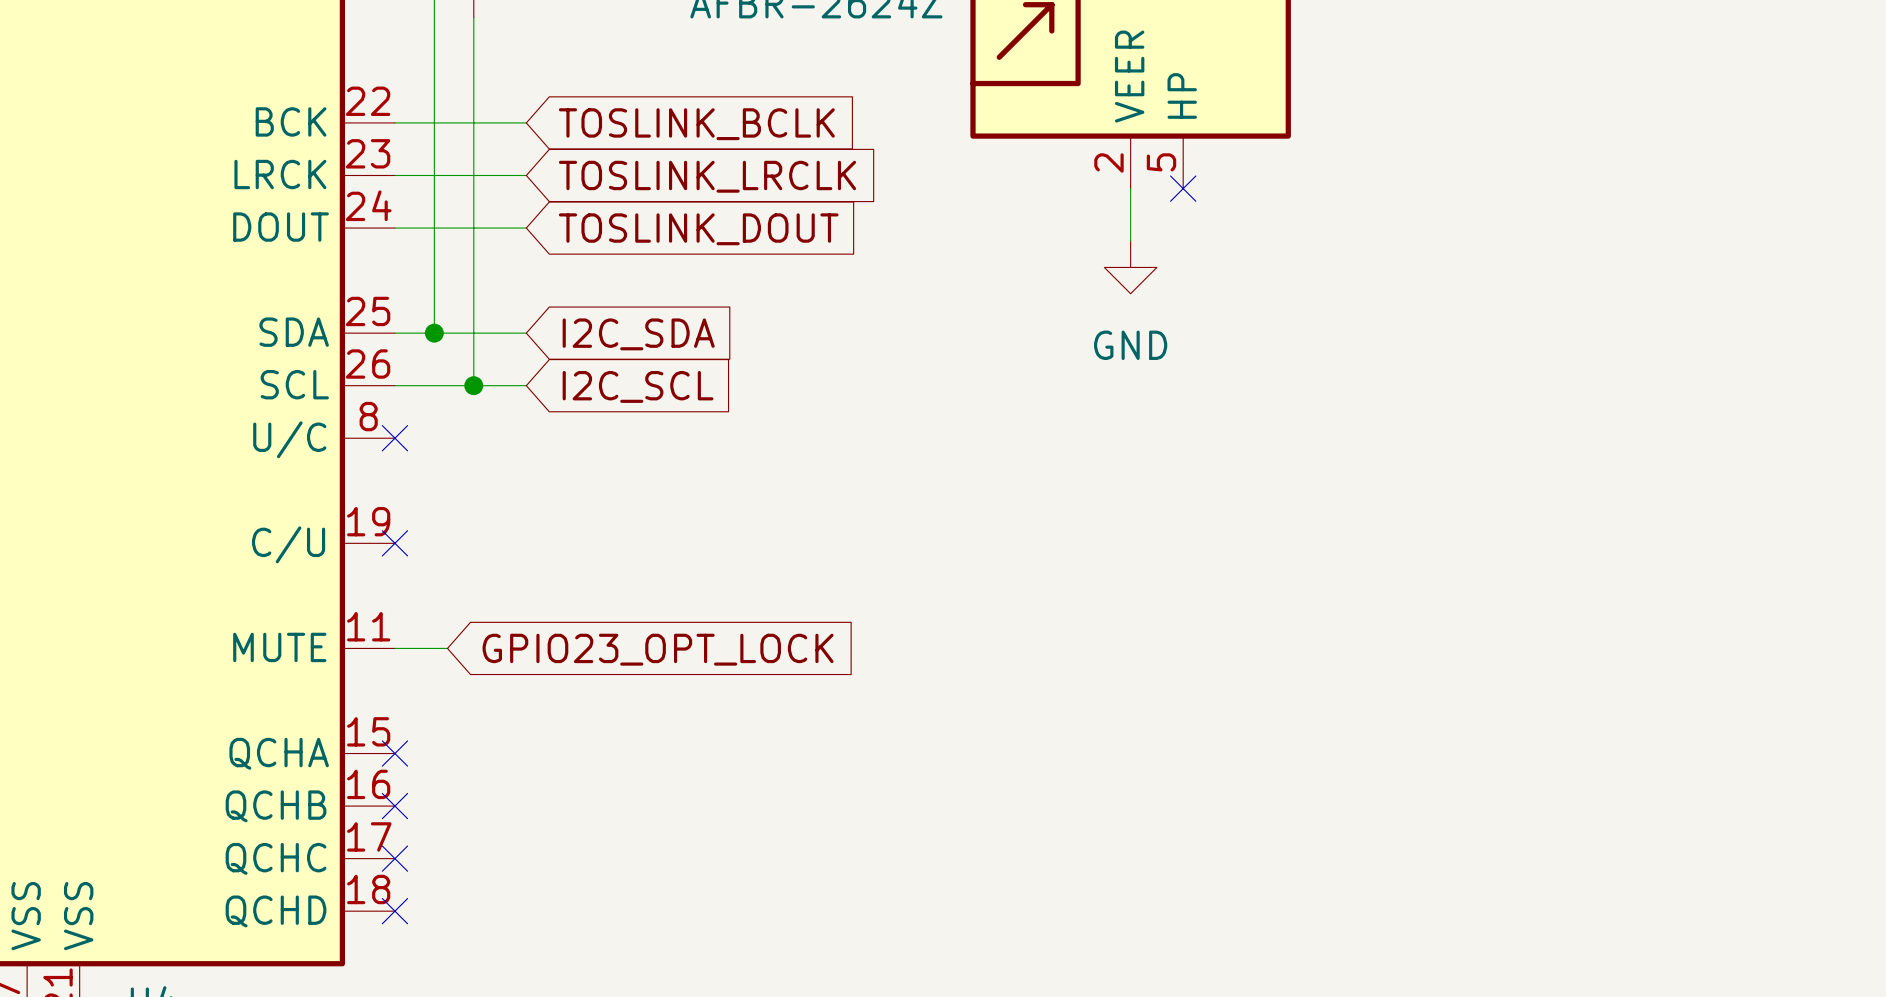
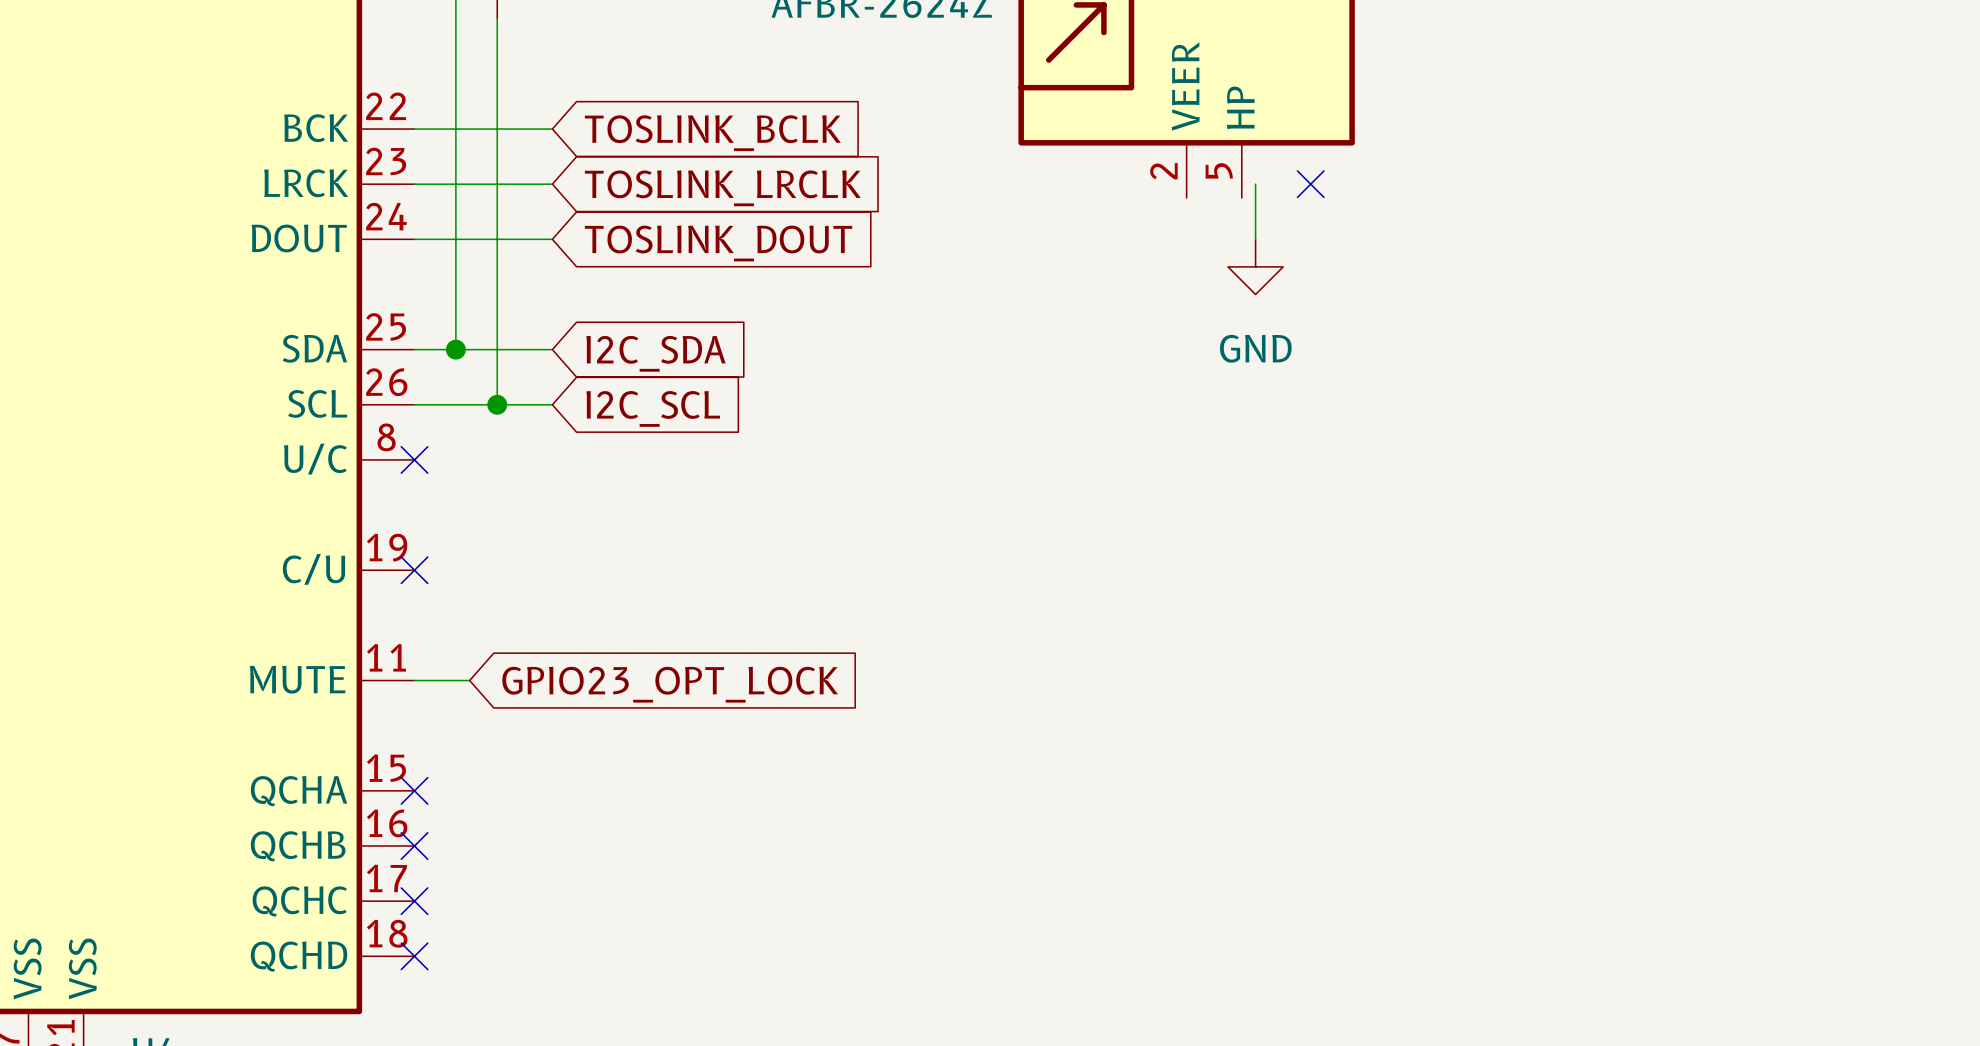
wire: (1130, 188) (1130, 241) -> (1255, 184) (1255, 239)
no-connect mark position: (1183, 188) -> (1310, 184)
power symbol position: GND (1130, 267) -> GND (1255, 266)

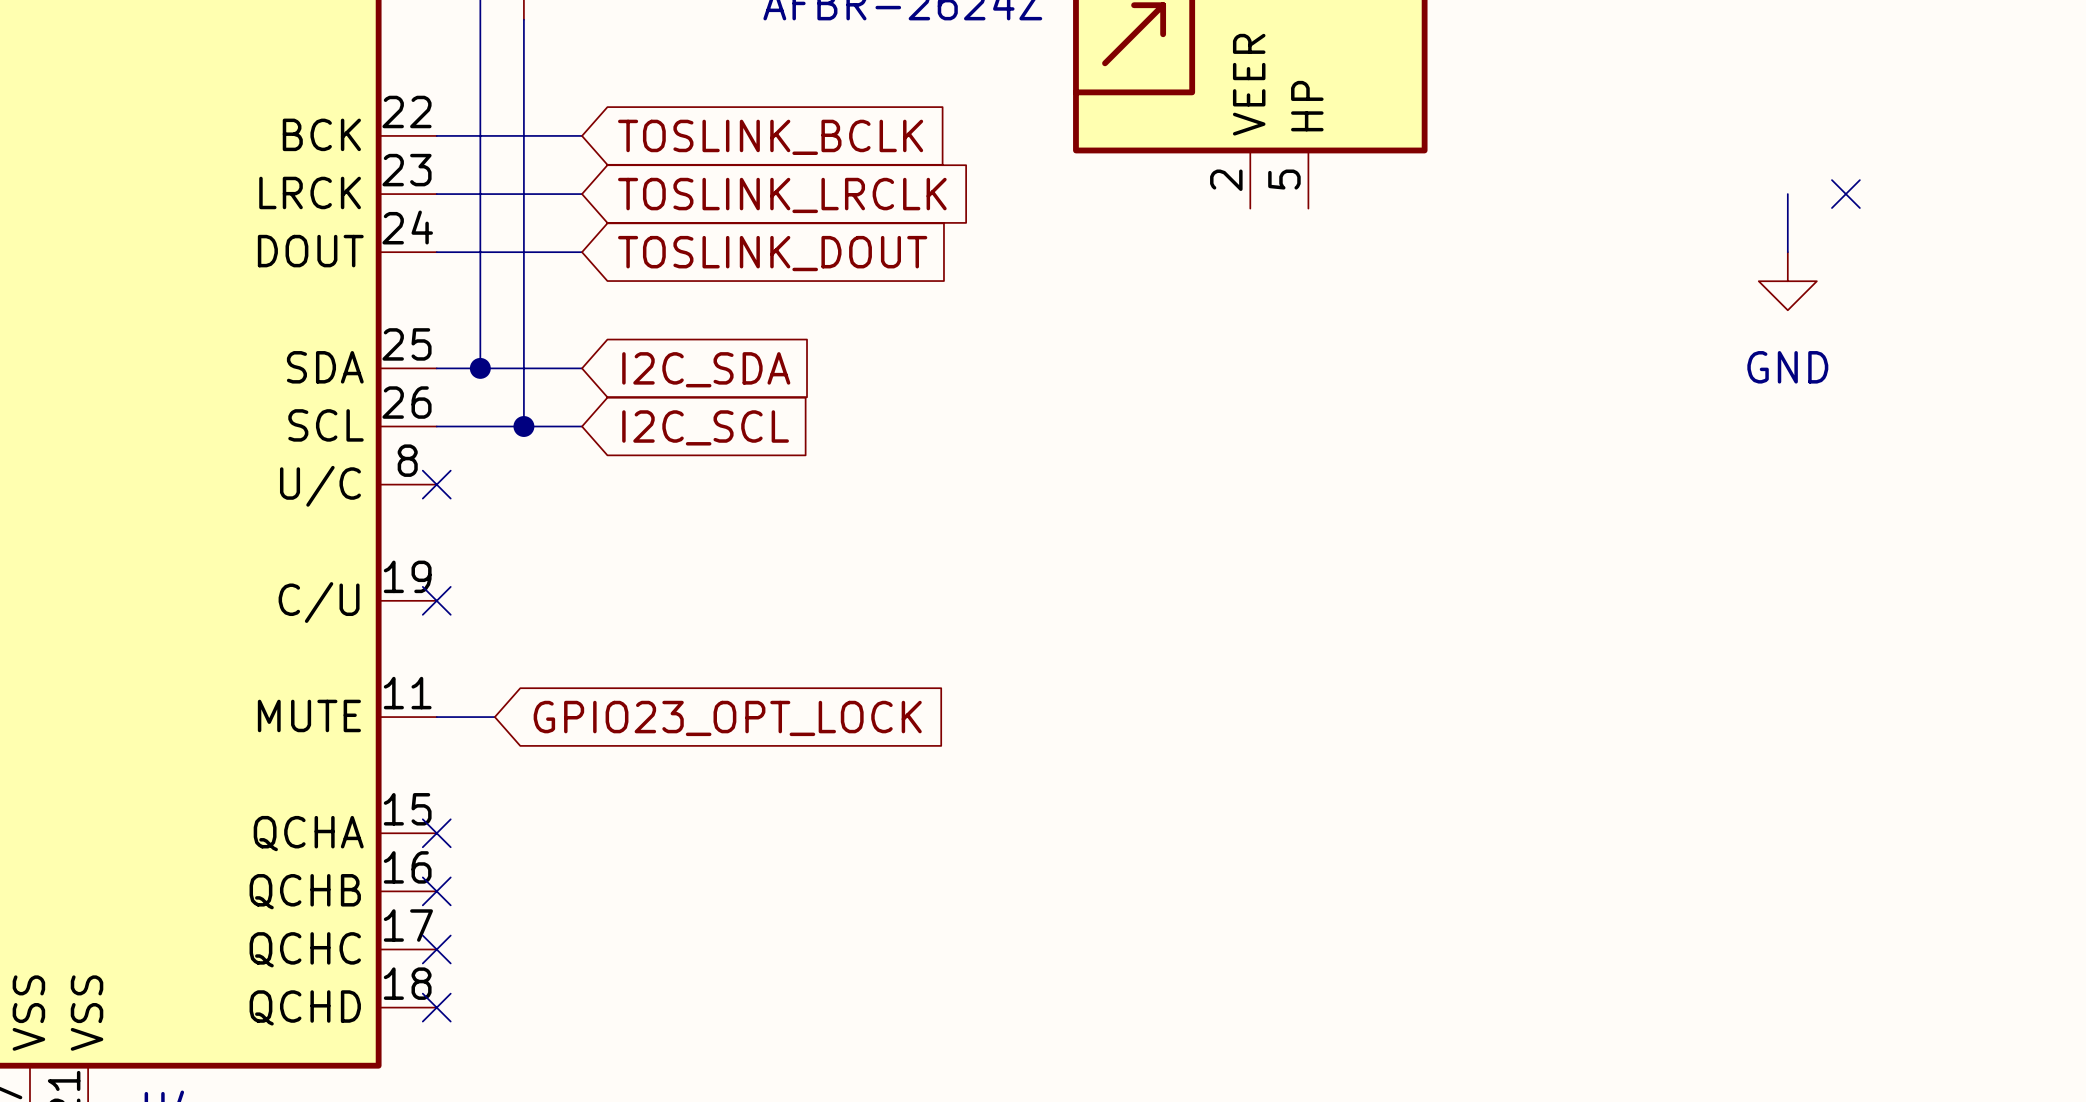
wire: (1255, 184) (1255, 239) -> (1787, 194) (1787, 252)
no-connect mark: (1310, 184) -> none
no-connect mark: none -> (1845, 194)
power symbol position: GND (1255, 266) -> GND (1787, 281)

